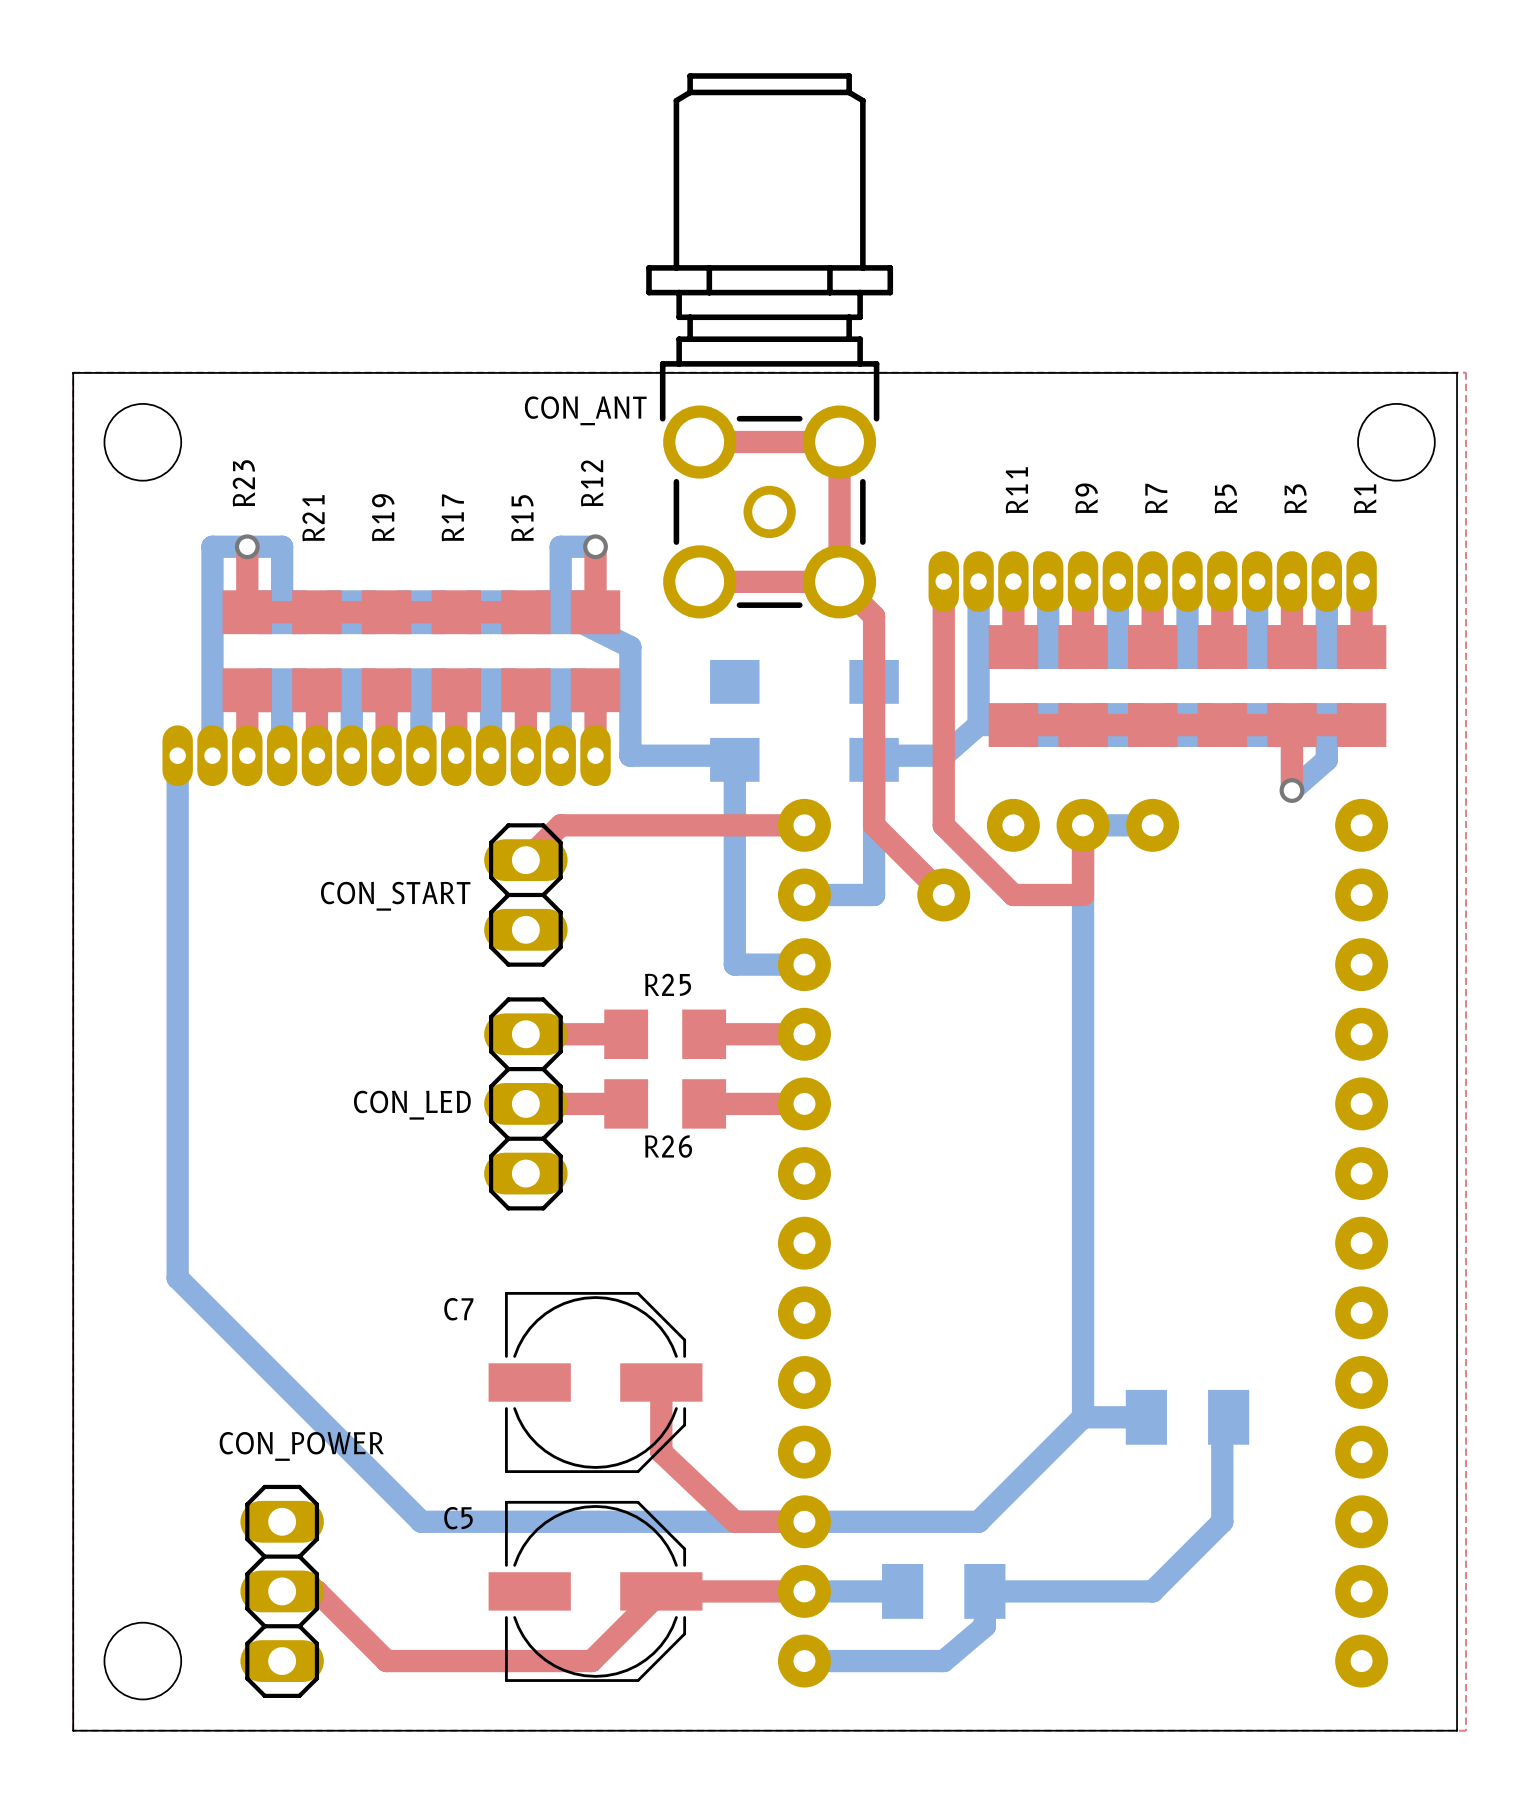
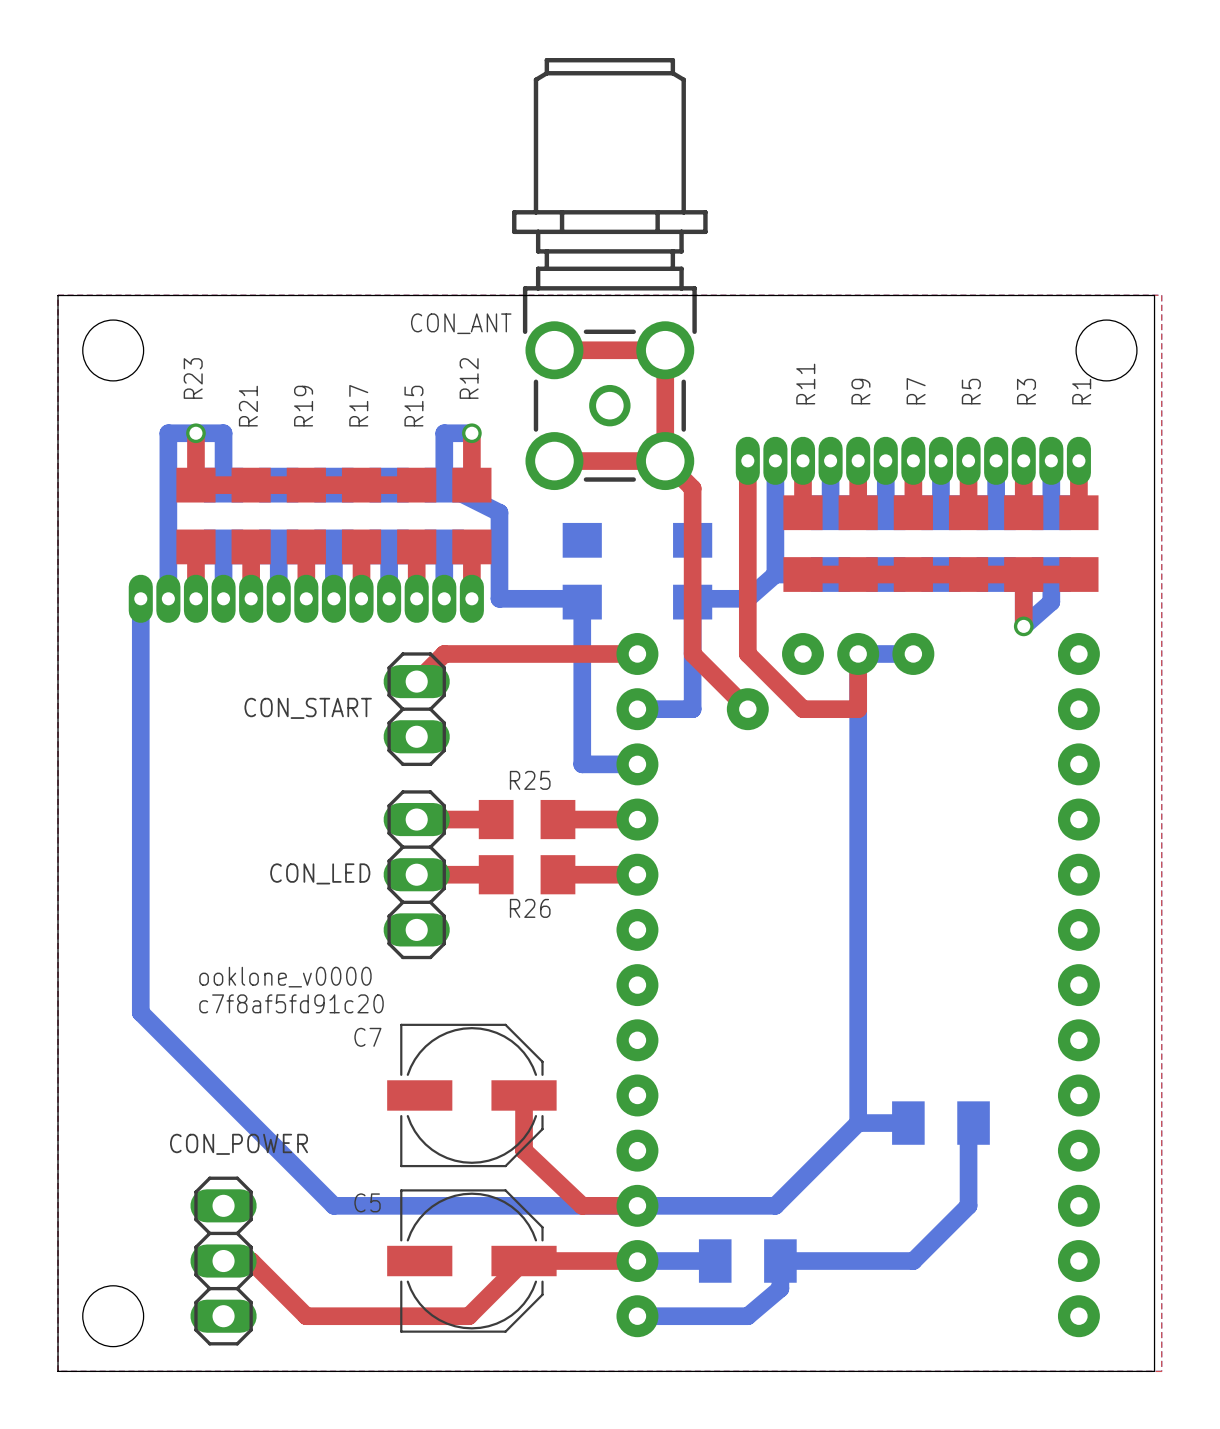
text: none -> ooklone_v0000 (285, 977)
text: none -> c7f8af5fd91c20 (291, 1003)

